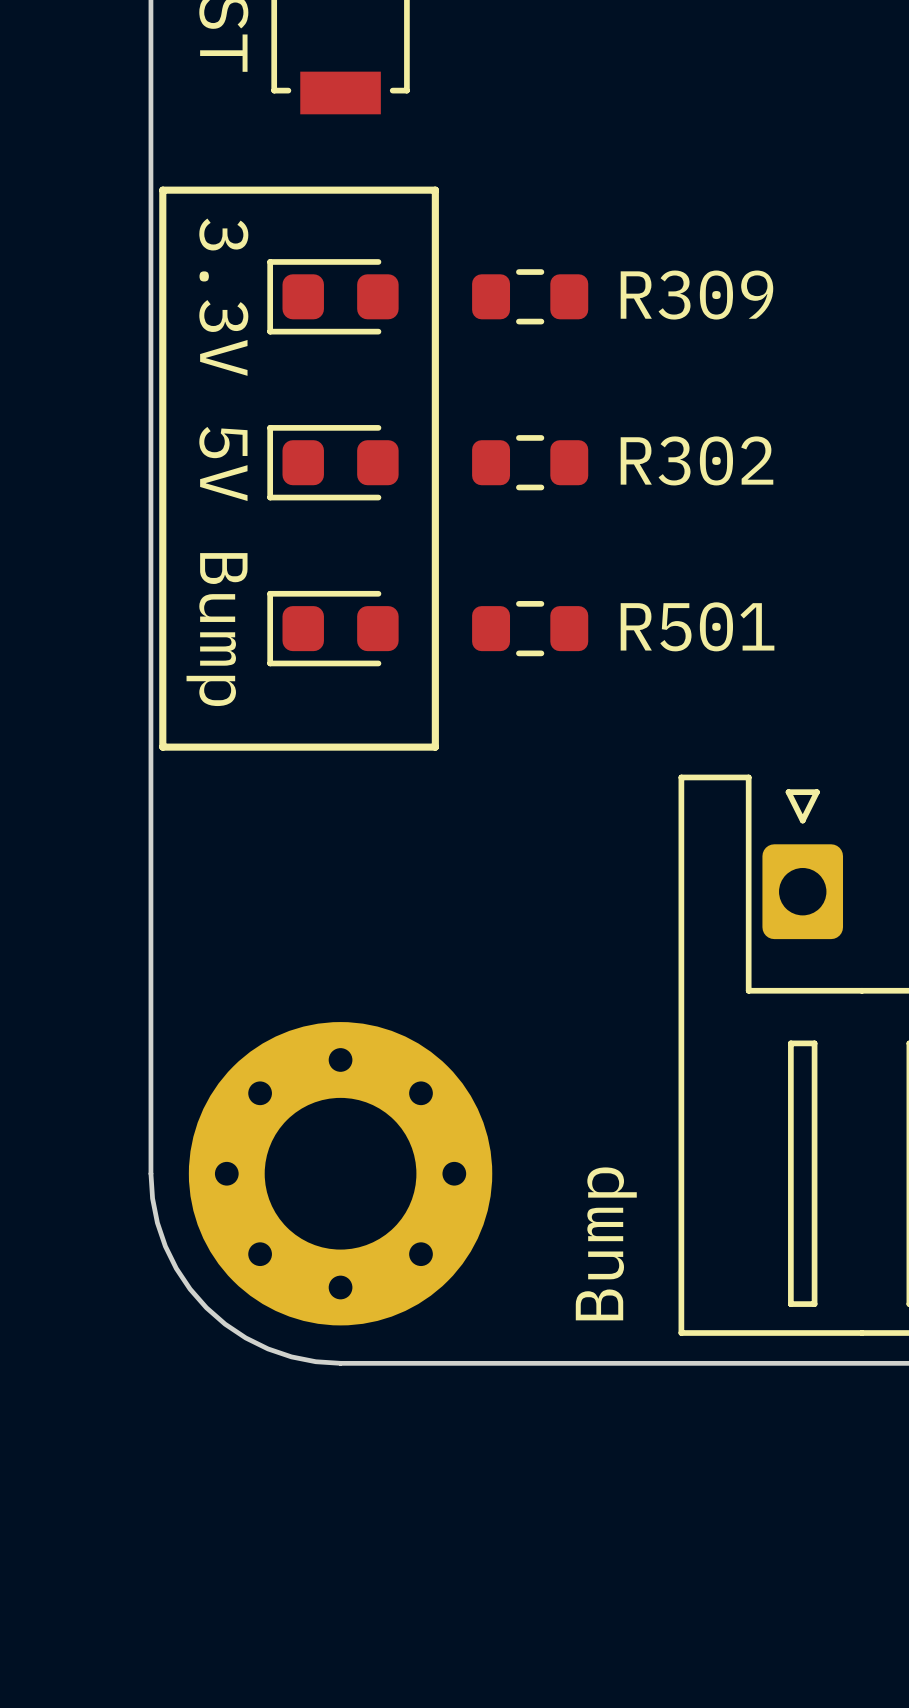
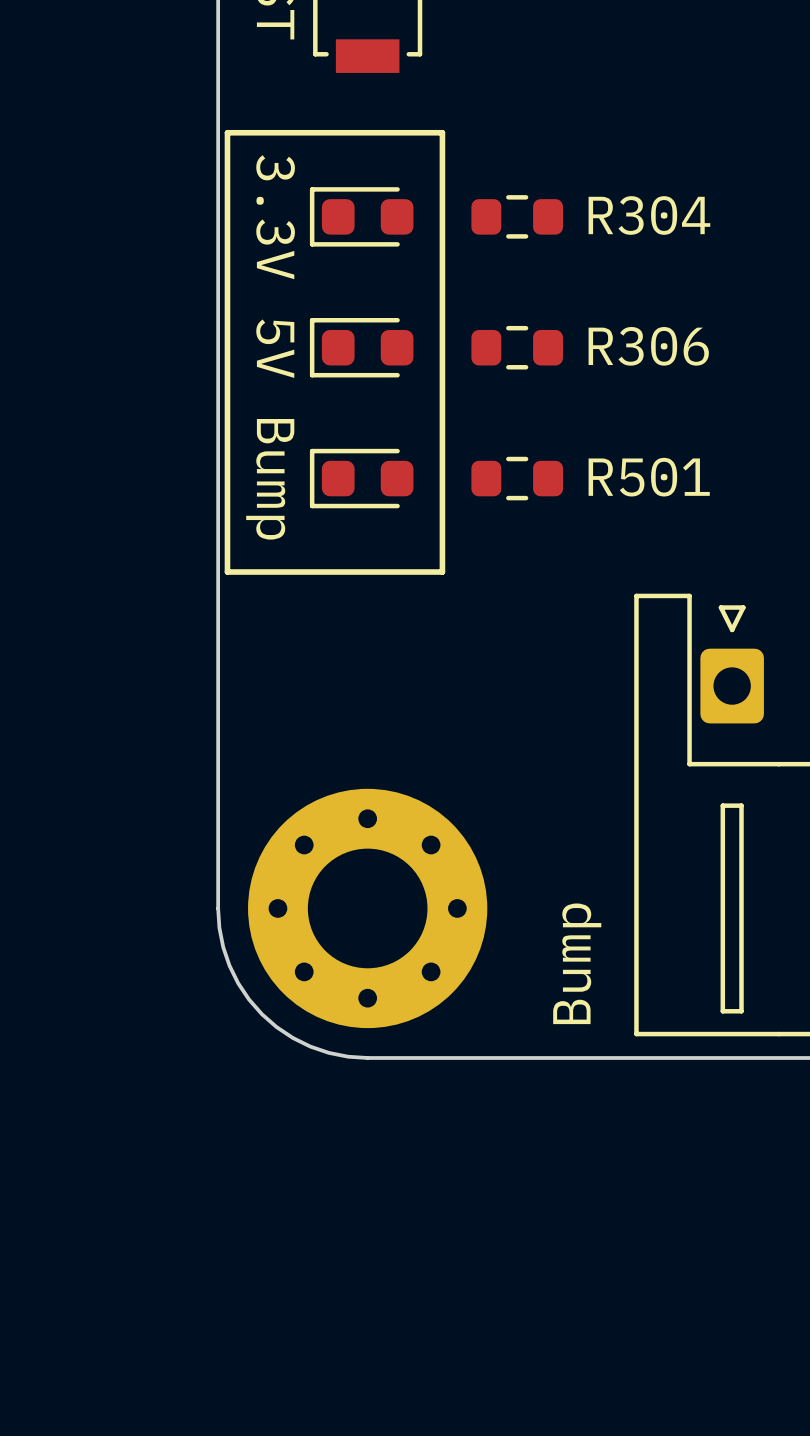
R309 name: R309 (696, 295) -> R304 (649, 215)
R302 name: R302 (696, 460) -> R306 (648, 346)

